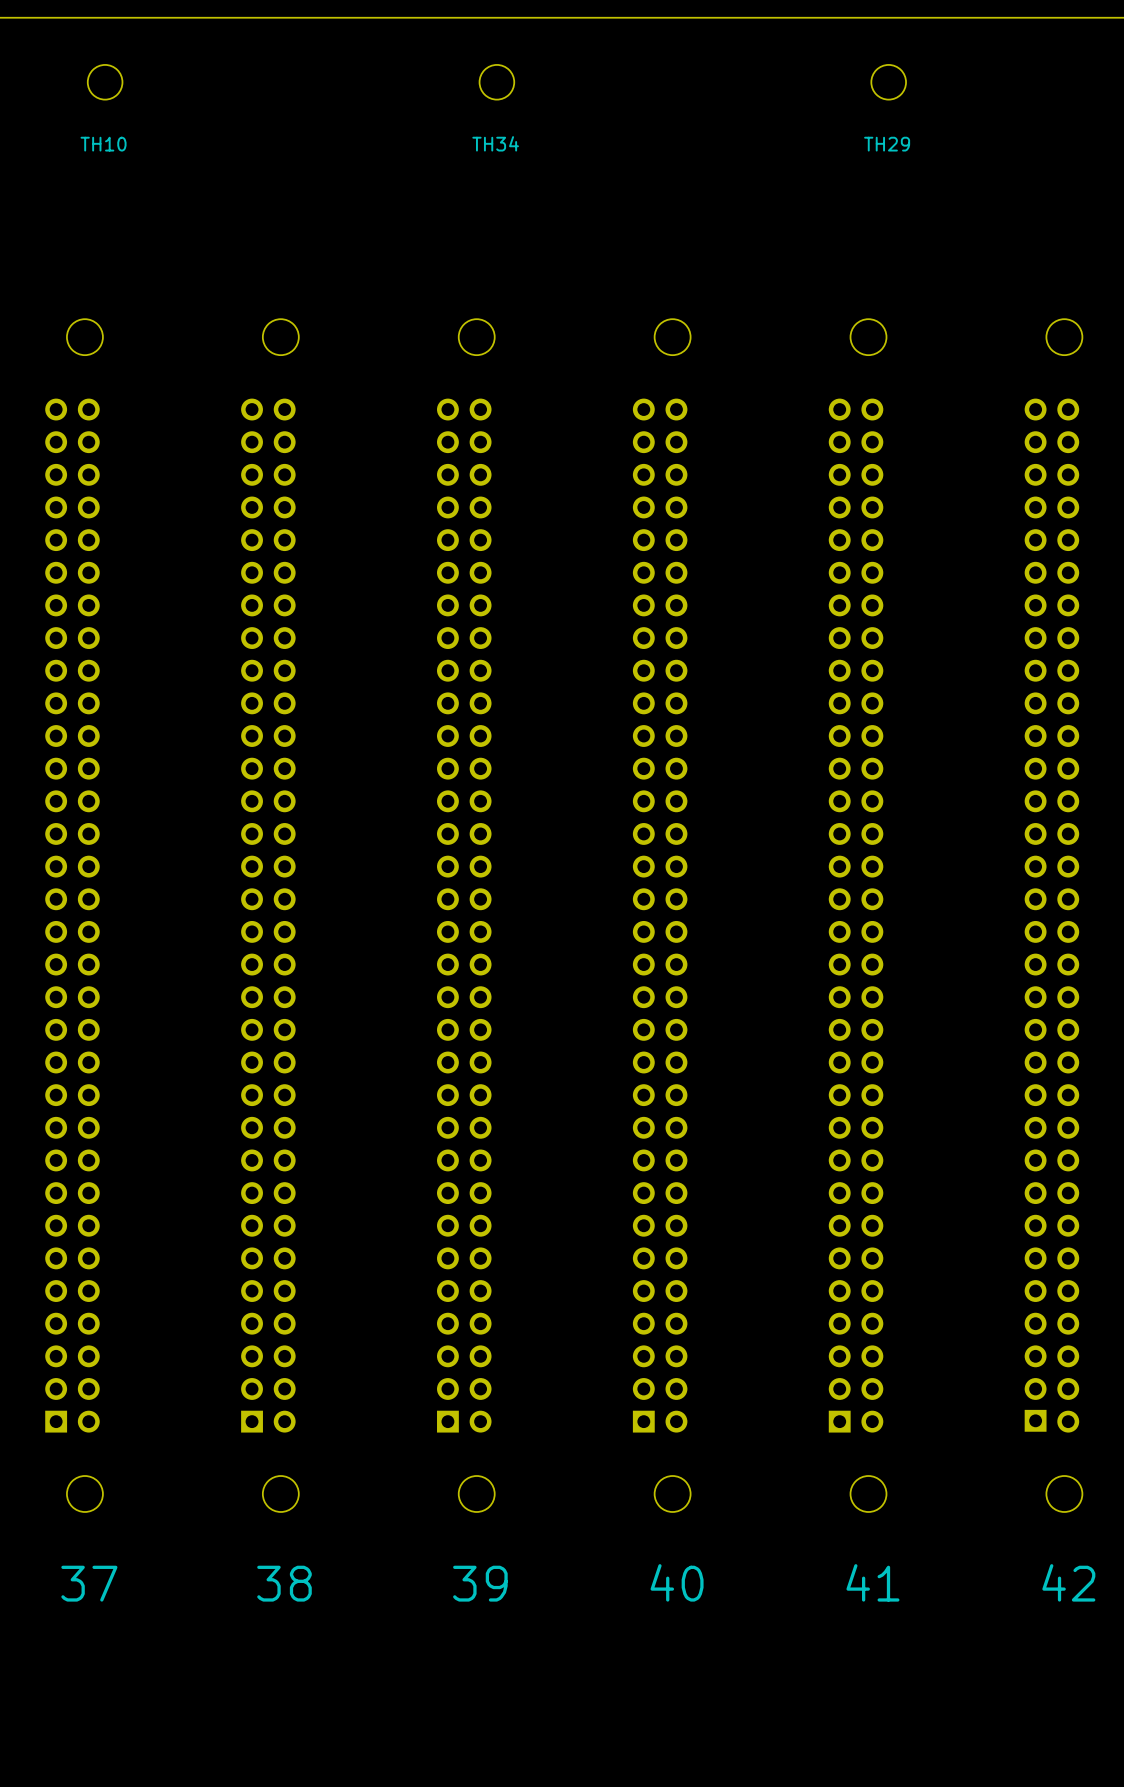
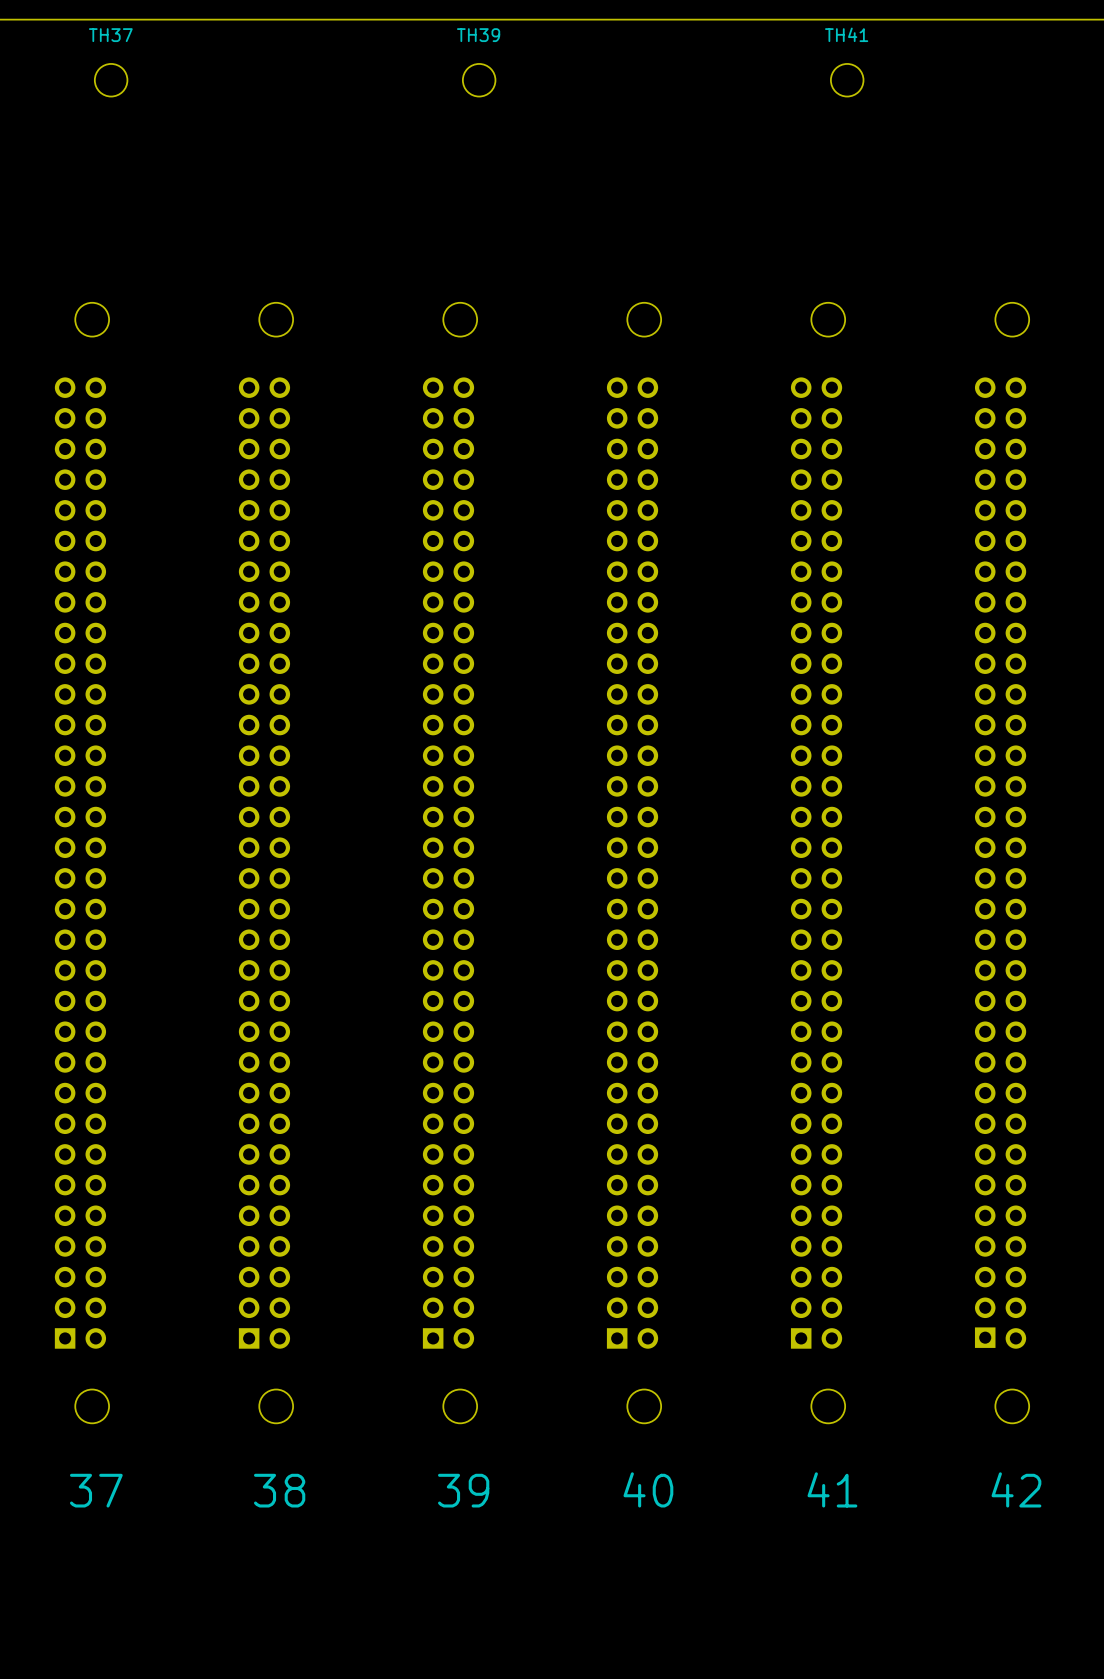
TH34 name: TH34 (495, 143) -> TH39 (478, 35)
TH10 name: TH10 (103, 144) -> TH37 (110, 35)
TH29 name: TH29 (887, 144) -> TH41 (846, 34)

